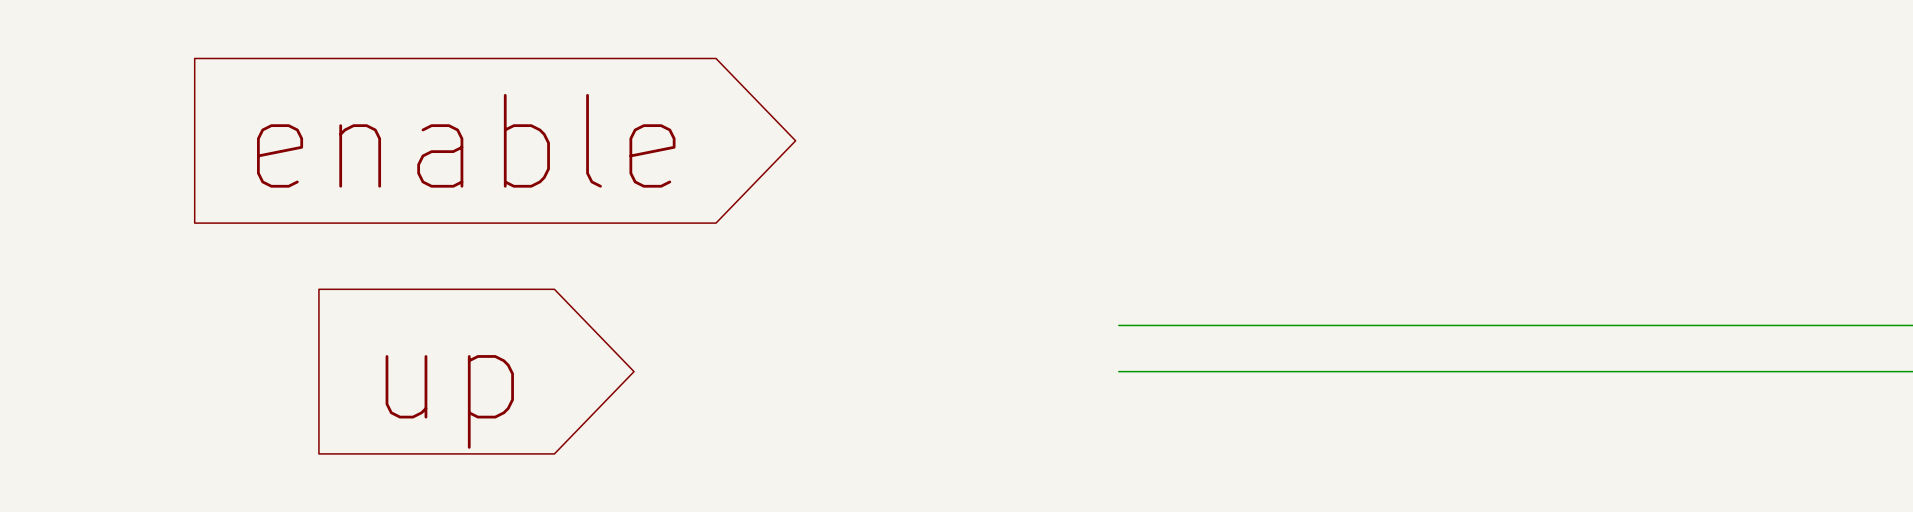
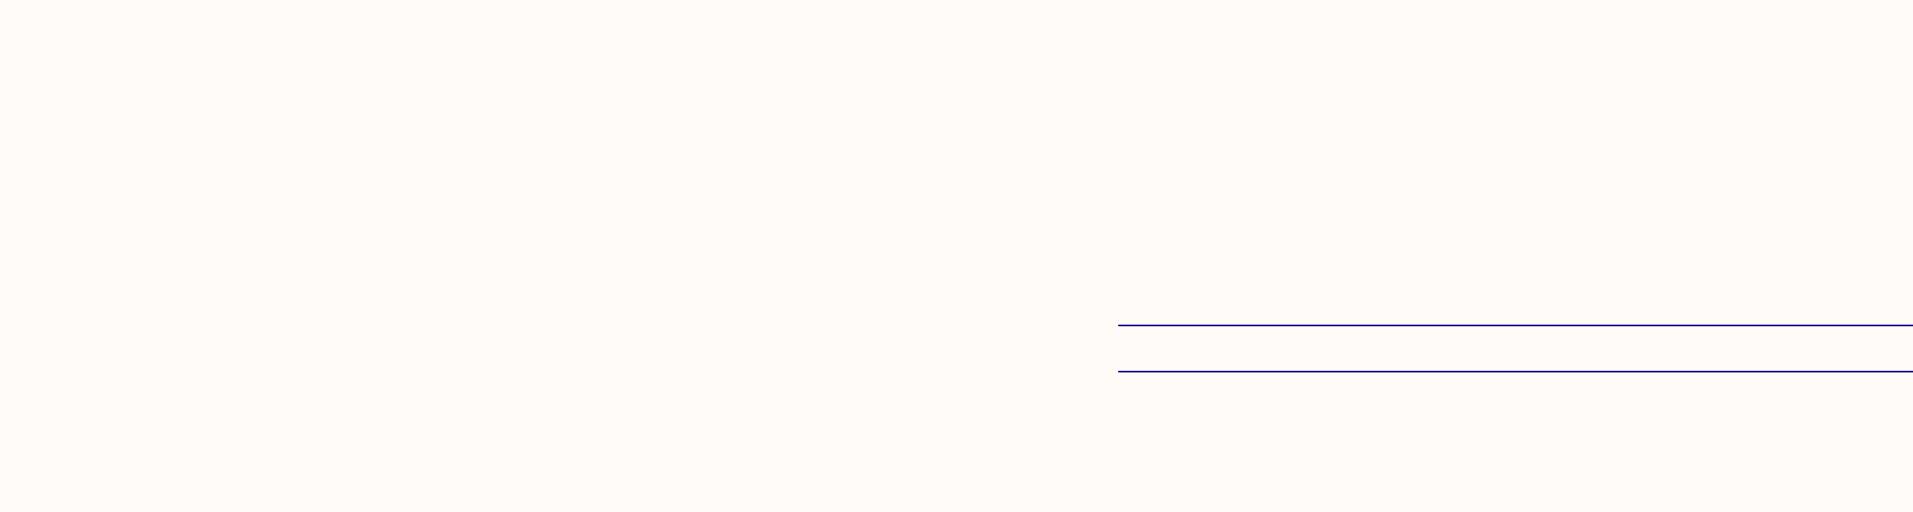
global label: enable (466, 140) -> none
global label: up (449, 401) -> none

